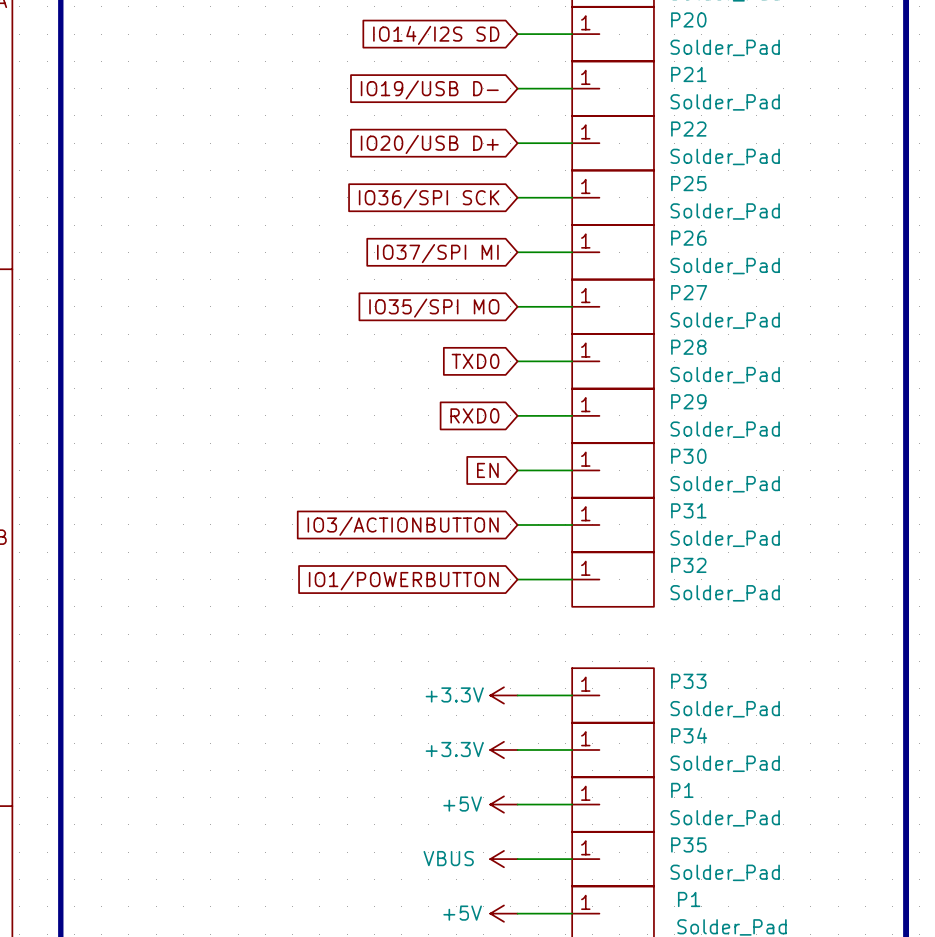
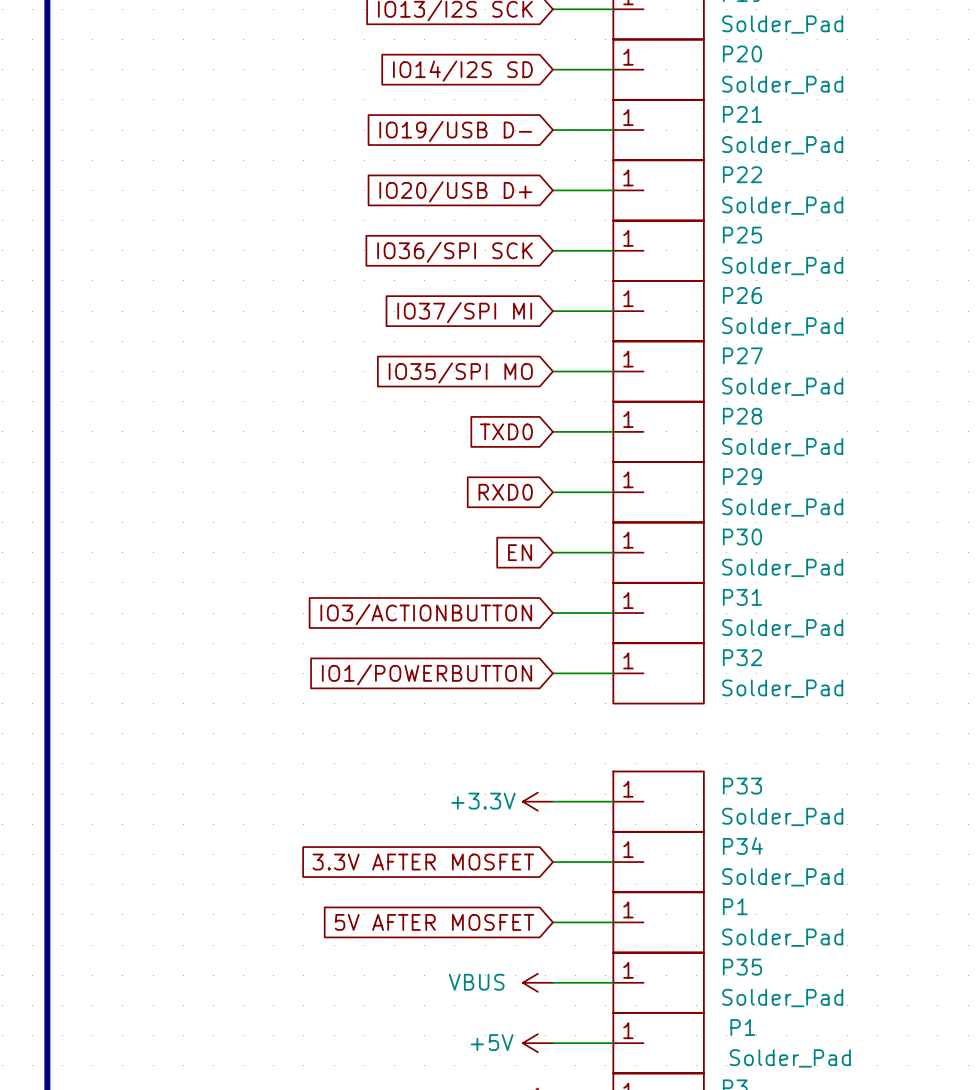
global label: none -> 3.3V AFTER MOSFET (423, 862)
power symbol: +3.3V (503, 749) -> none
global label: none -> 5V AFTER MOSFET (434, 922)
power symbol: +5V (503, 804) -> none

